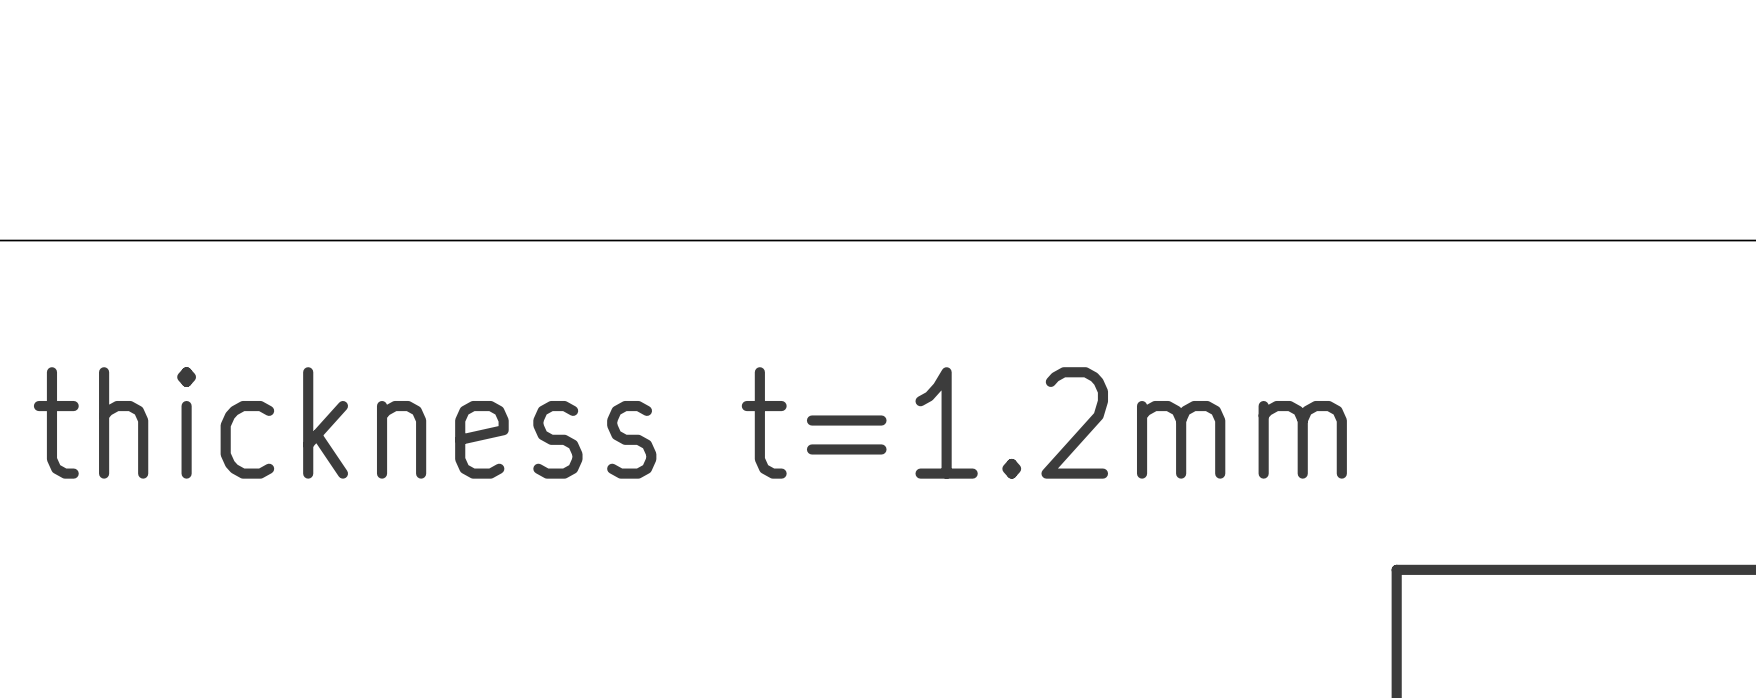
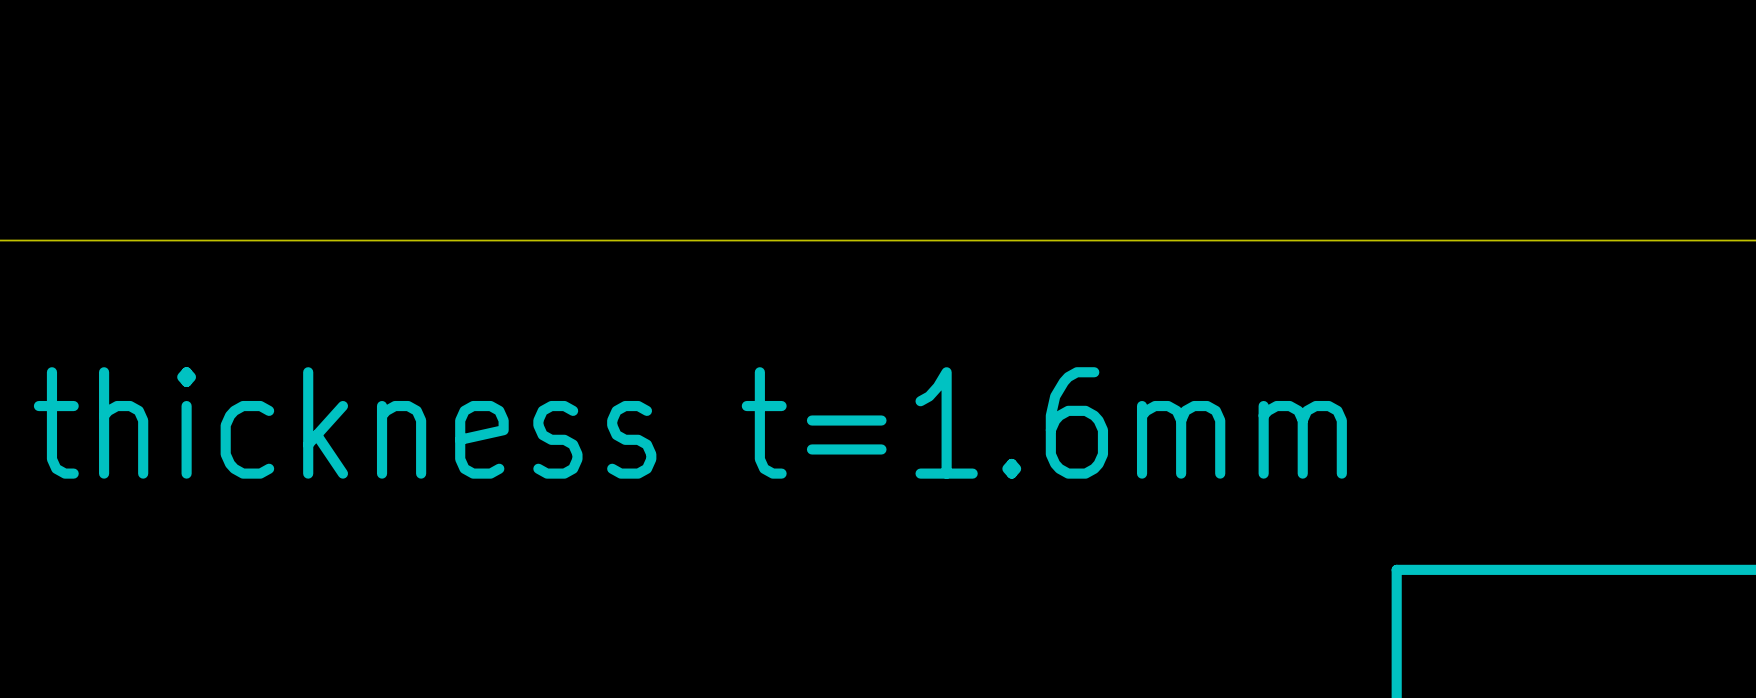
text: thickness t=1.2mm (690, 422) -> thickness t=1.6mm (690, 422)

